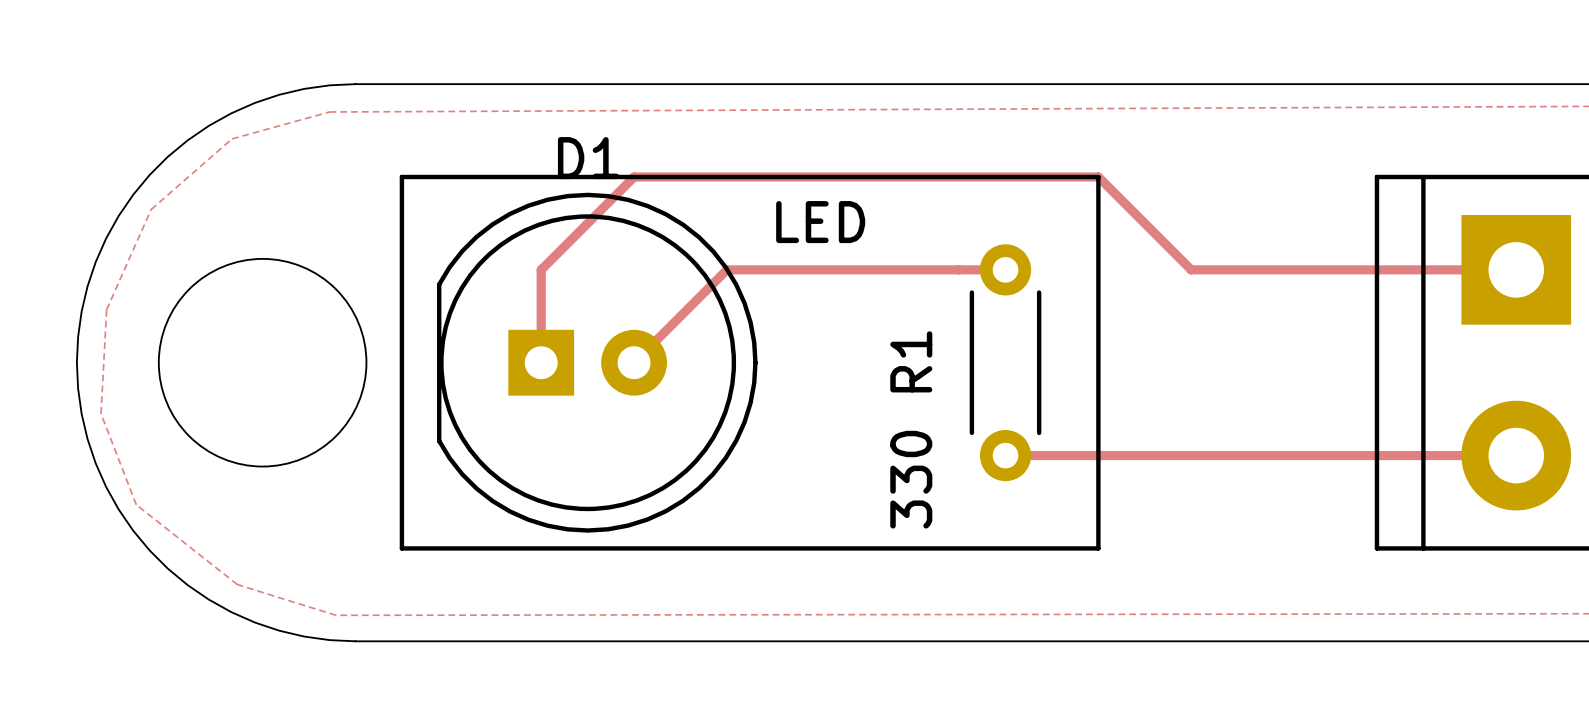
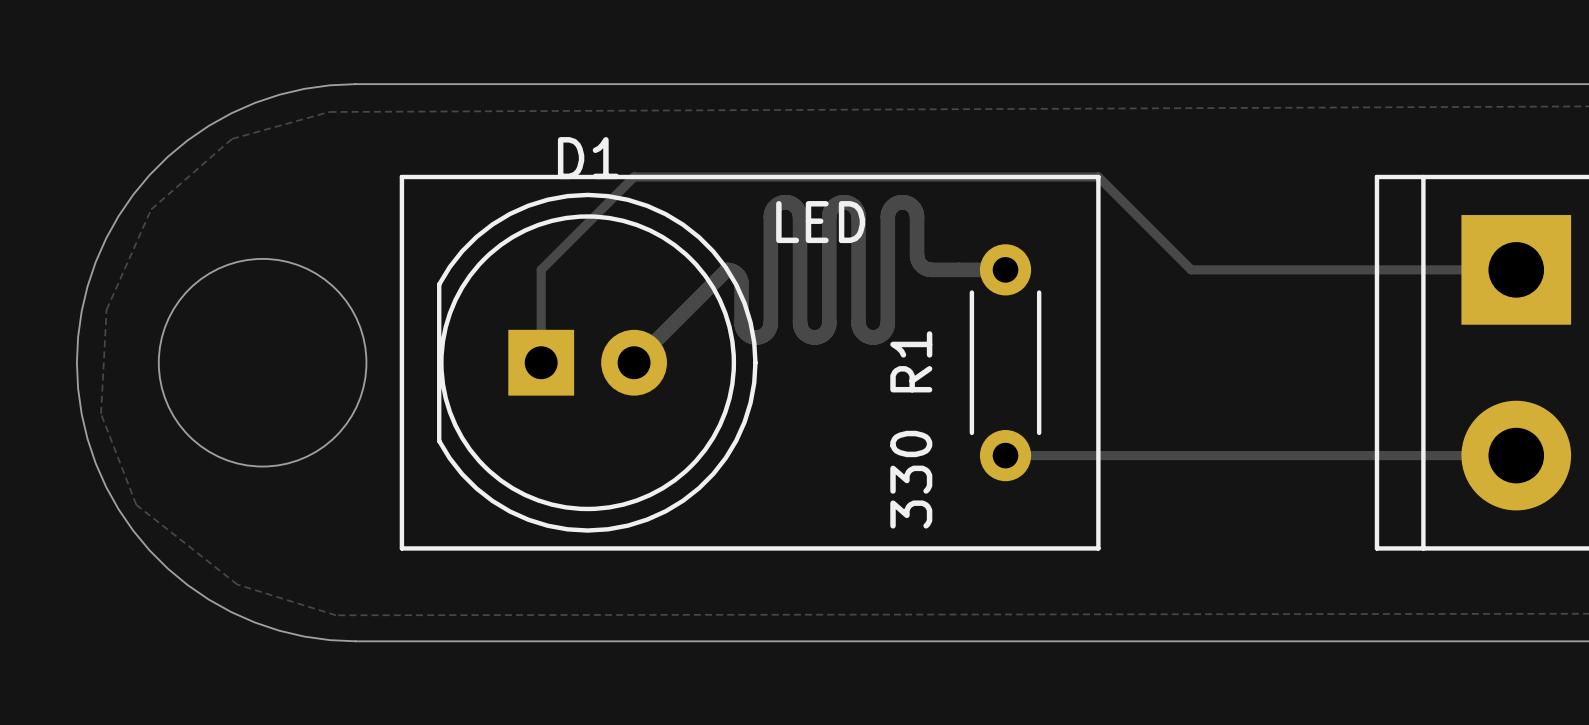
track: (726, 269) (931, 269) -> (726, 269) (736, 273) (741, 281) (743, 329) (752, 337) (762, 336) (769, 329) (770, 322) (771, 213) (776, 205) (785, 202) (794, 205) (799, 213) (800, 322) (801, 329) (808, 336) (821, 336) (828, 326) (829, 216) (830, 210) (837, 203) (850, 203) (858, 213) (858, 322) (864, 334) (876, 337) (882, 334) (887, 326) (887, 216) (889, 210) (896, 203) (905, 202) (915, 210) (917, 258) (922, 266) (931, 269)
track width: thin (726, 269) (634, 362) -> thick (726, 269) (634, 362)
track width: thin (931, 269) (1005, 269) -> thick (931, 269) (1005, 269)

